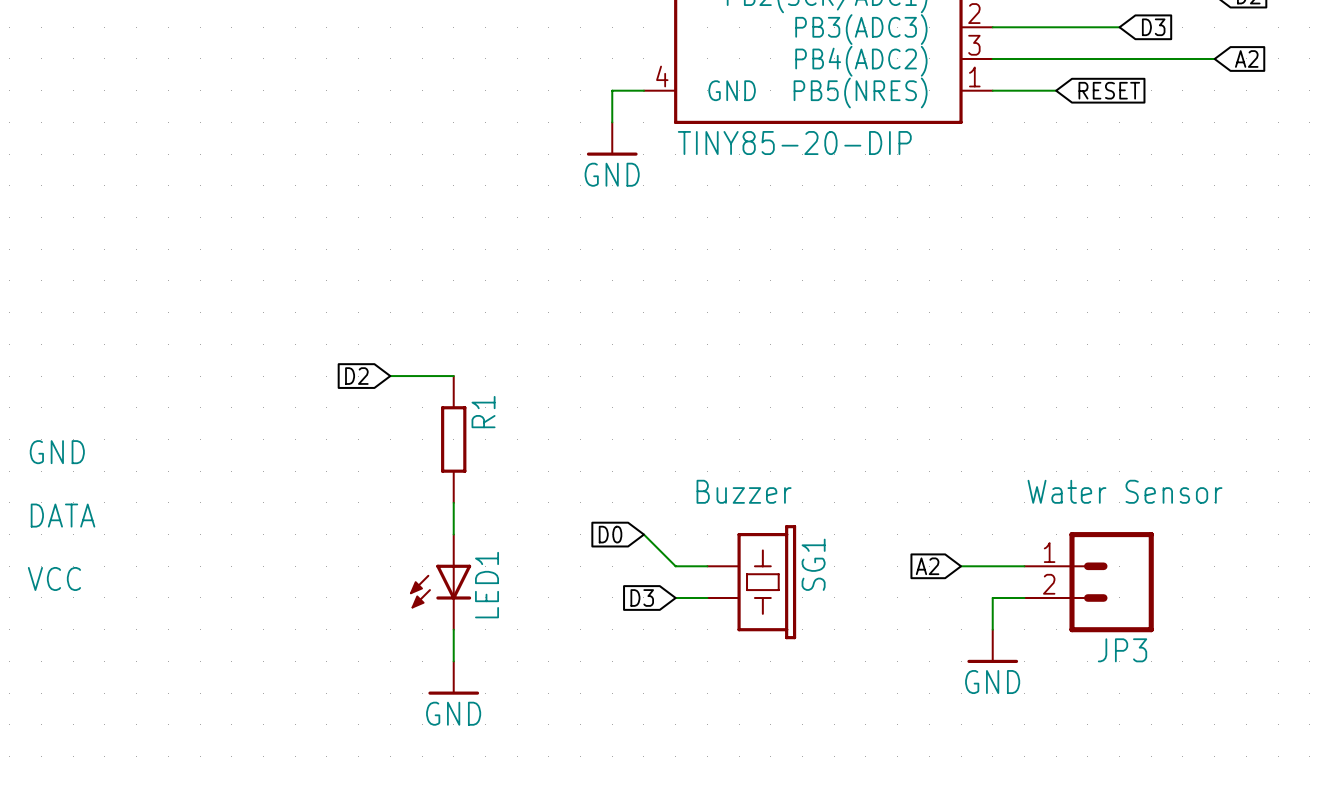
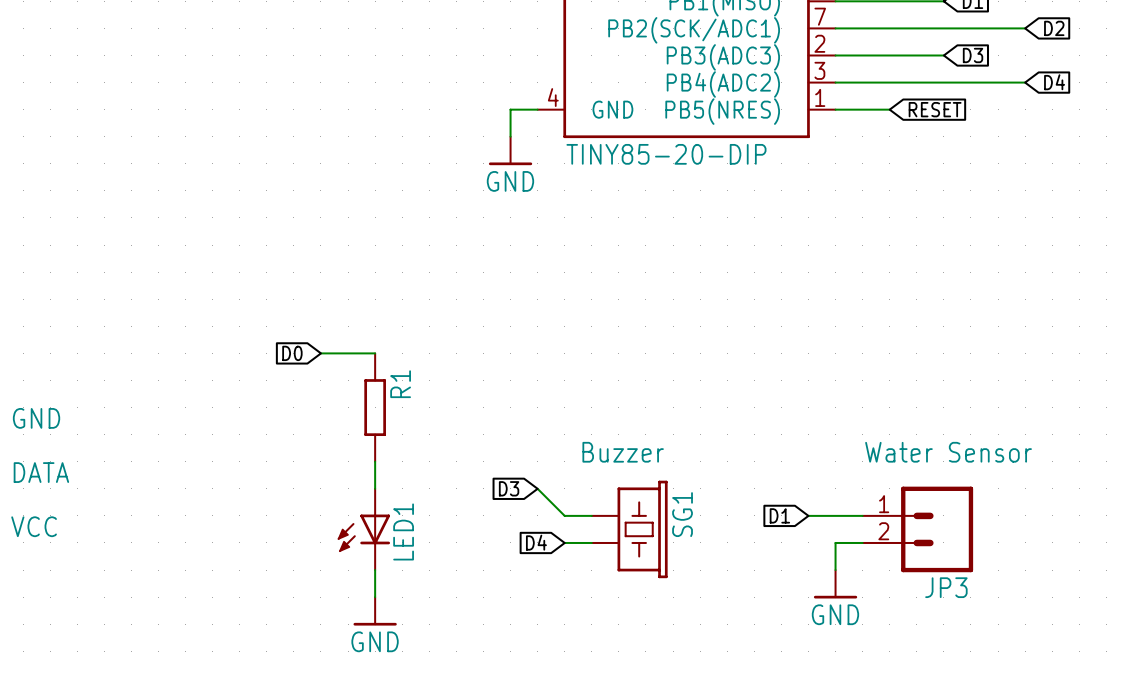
global label: A2 (1246, 58) -> D4 (1054, 82)
global label: D2 (356, 376) -> D0 (292, 353)
global label: D0 (610, 534) -> D3 (509, 488)
global label: A2 (927, 566) -> D1 (779, 515)
global label: D3 (642, 597) -> D4 (536, 542)

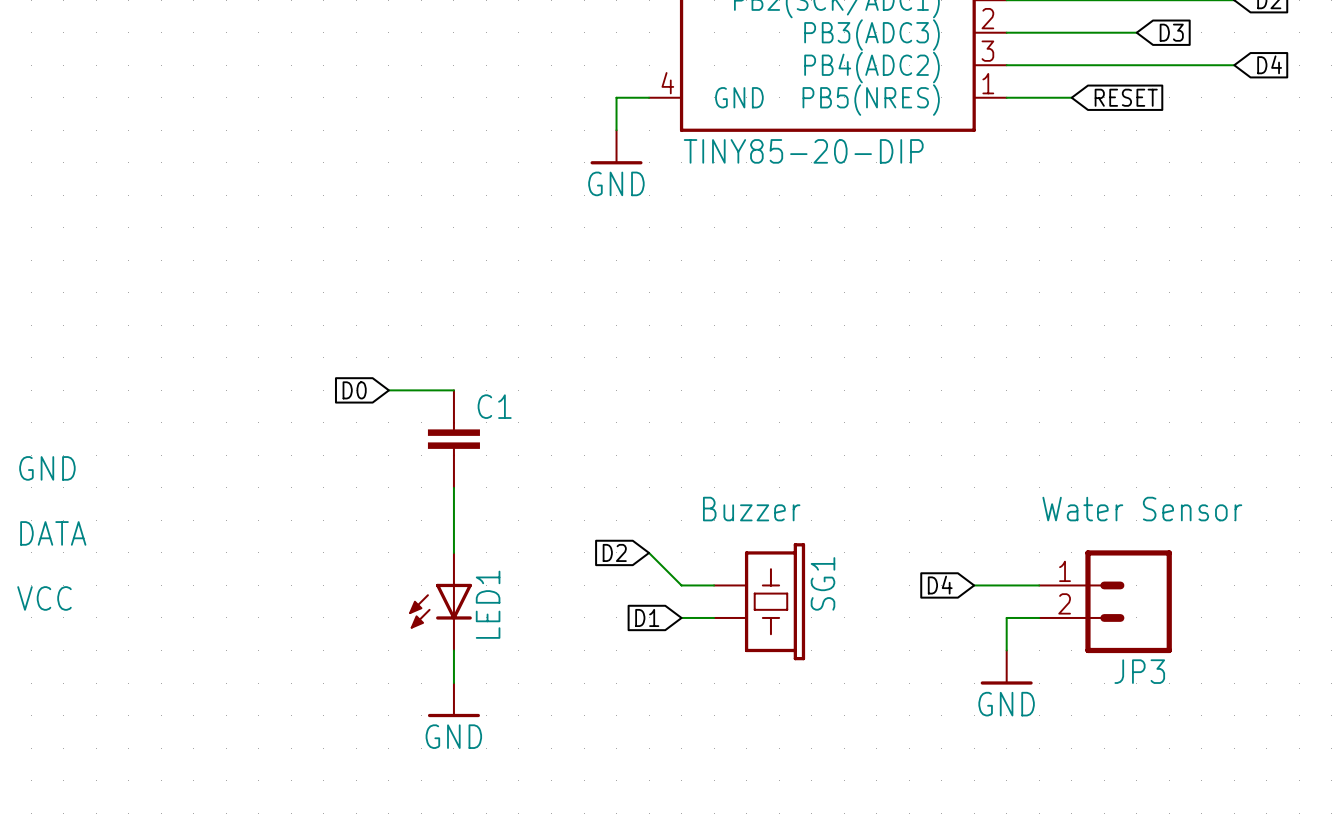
C1: none -> (453, 439)
R1: (375, 407) -> none
global label: D3 (509, 488) -> D2 (614, 552)
global label: D1 (779, 515) -> D4 (940, 585)
global label: D4 (536, 542) -> D1 (647, 617)

